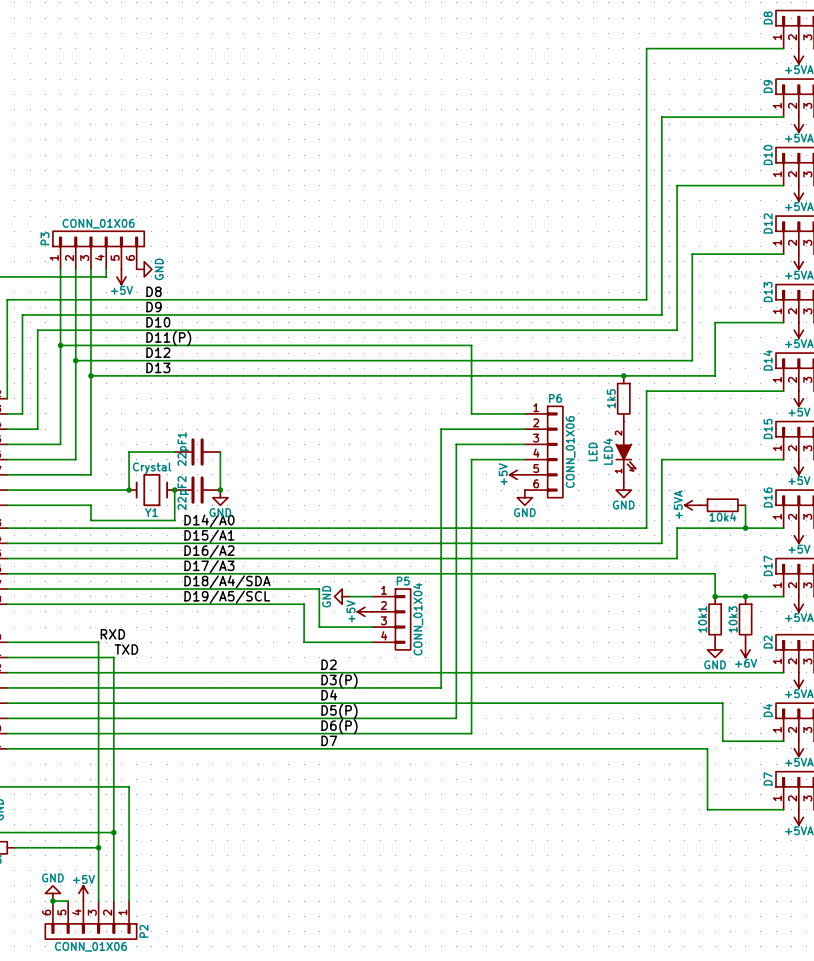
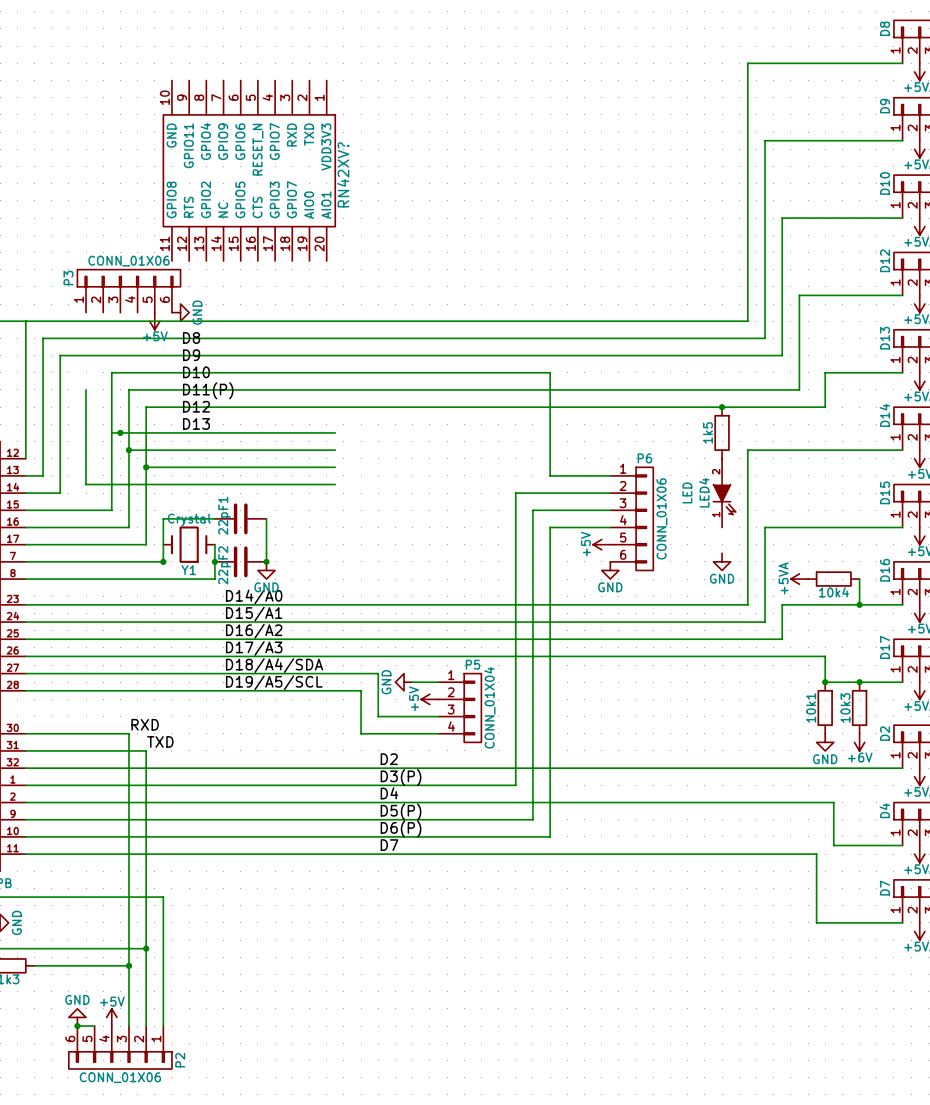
RN42XV?: none -> (249, 170)
wire: (60, 269) (60, 337) -> none
wire: (75, 269) (75, 459) -> none
wire: (90, 269) (90, 474) -> none
wire: (106, 269) (106, 276) -> none
wire: none -> (25, 321) (25, 346)
wire: (646, 276) (646, 299) (7, 299) -> (747, 321) (137, 321)
wire: (661, 292) (661, 315) (22, 315) -> (765, 338) (43, 338) (43, 364)
wire: (677, 307) (677, 330) (37, 330) -> (782, 355) (60, 355) (60, 381)
wire: (692, 337) (692, 360) (75, 360) -> (799, 389) (128, 389) (128, 527) (103, 527)
wire: (60, 345) (471, 345) -> (86, 510) (111, 510) (111, 372) (550, 372) (550, 398)
junction: (60, 345) -> none
wire: (715, 353) (715, 375) (281, 375) -> (825, 407) (146, 407) (146, 544) (120, 544)
junction: (75, 360) -> none
wire: none -> (111, 432) (120, 432)
junction position: (623, 375) -> (722, 407)
wire: none -> (128, 450) (335, 450)
junction: none -> (128, 450)
1k5 position: (623, 398) -> (722, 432)
wire: none -> (146, 467) (335, 467)
junction: none -> (146, 467)
wire: (60, 421) (60, 444) -> (86, 484) (335, 484)
LED4 position: (626, 452) -> (724, 493)
wire: none -> (214, 544) (214, 561)
Y1 position: (151, 490) -> (189, 544)
wire: (90, 505) (90, 520) (174, 520) (174, 505) -> (120, 579) (214, 579)

